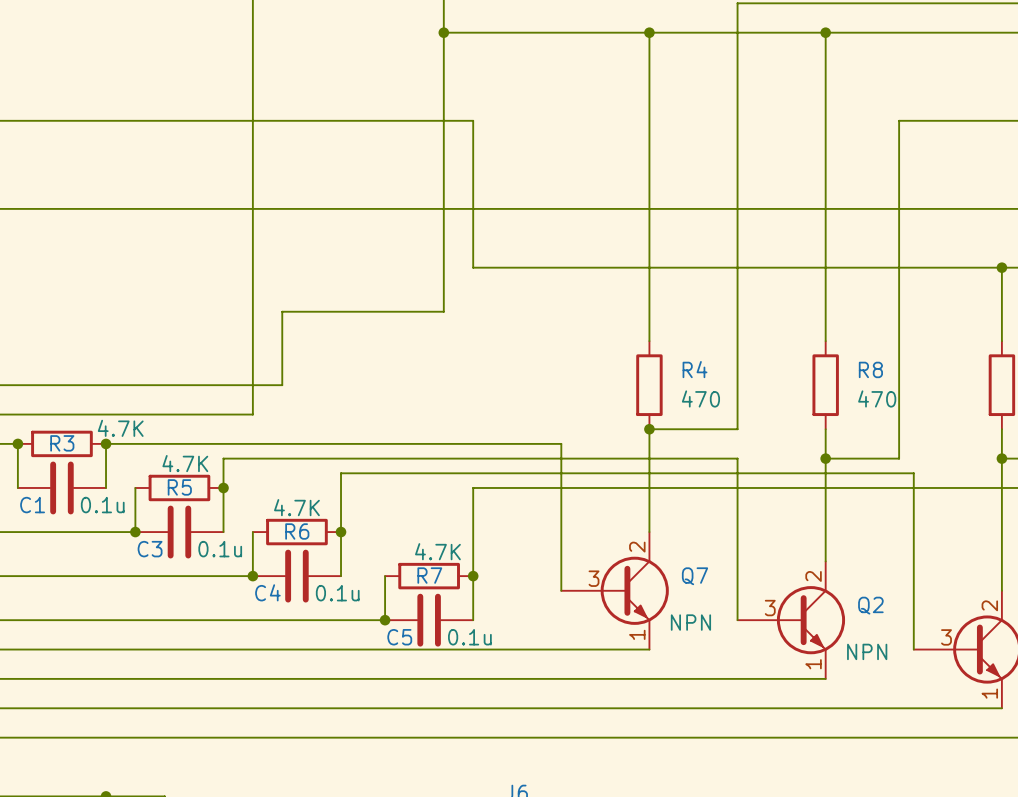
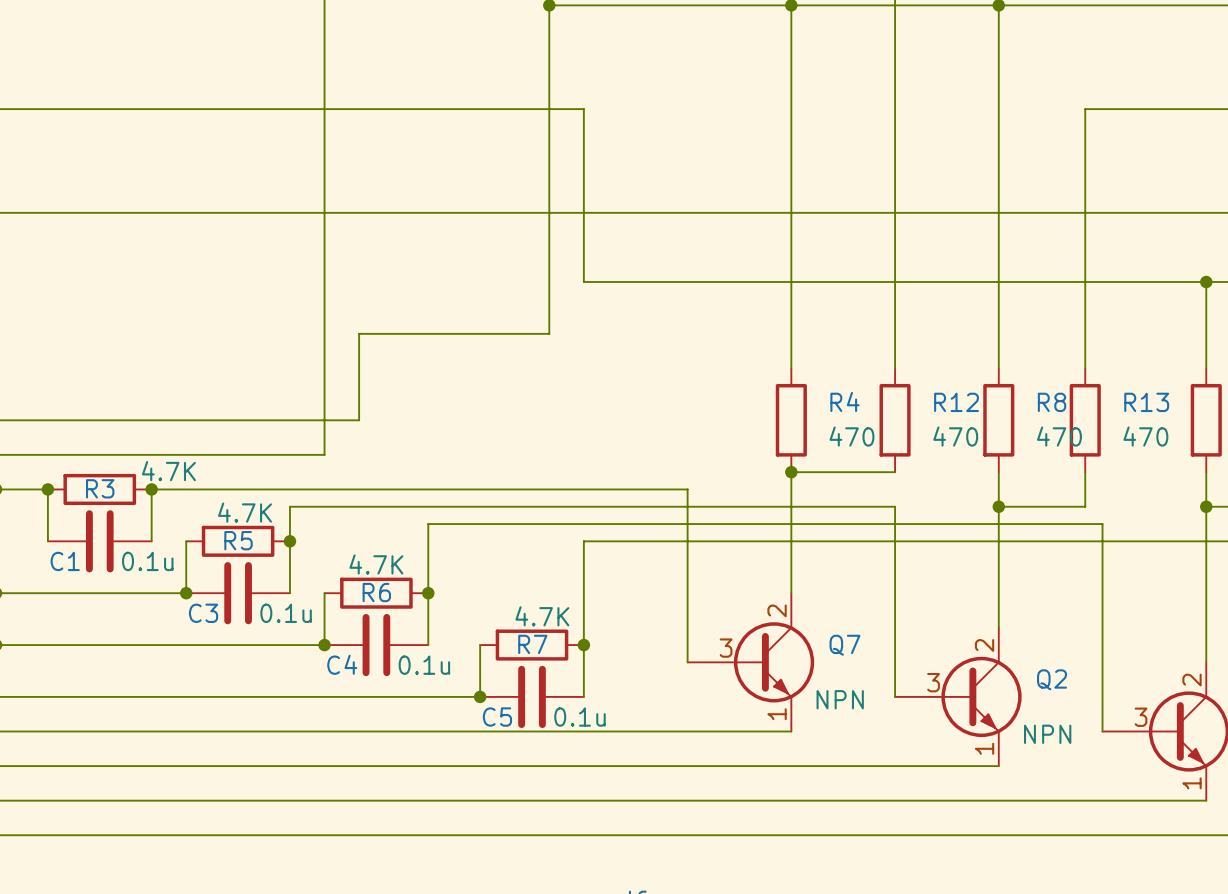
wire: (737, 341) (737, 429) -> none
wire: (899, 341) (899, 429) -> none
R12: none -> 470 (895, 420)
R13: none -> 470 (1085, 420)

